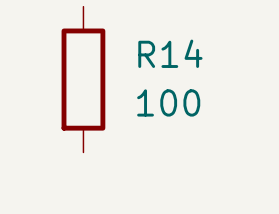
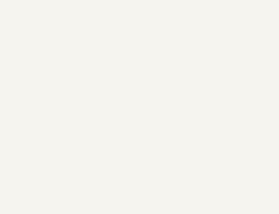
R14: 100 (83, 79) -> none

